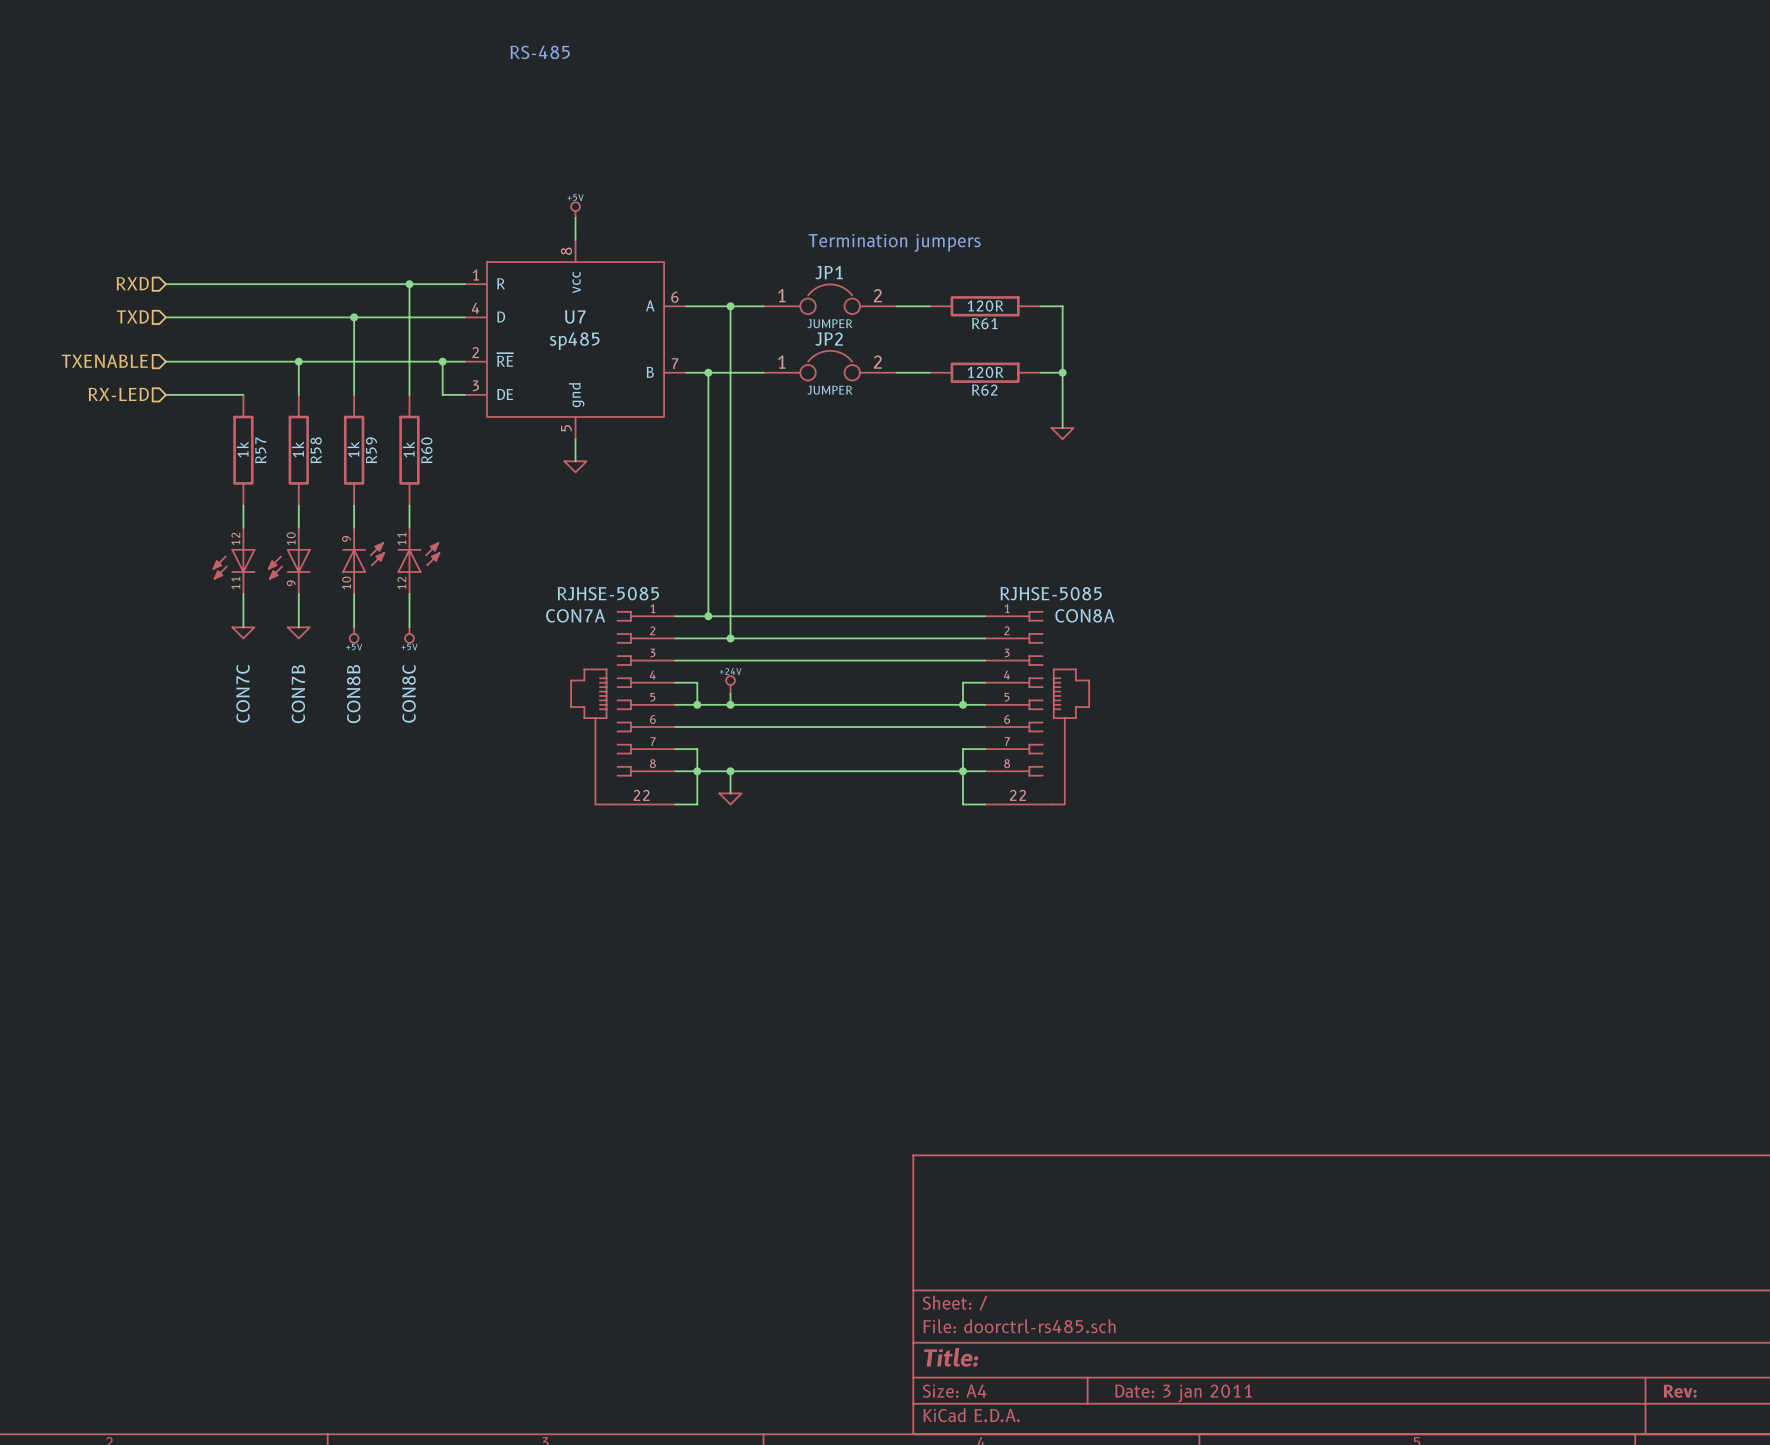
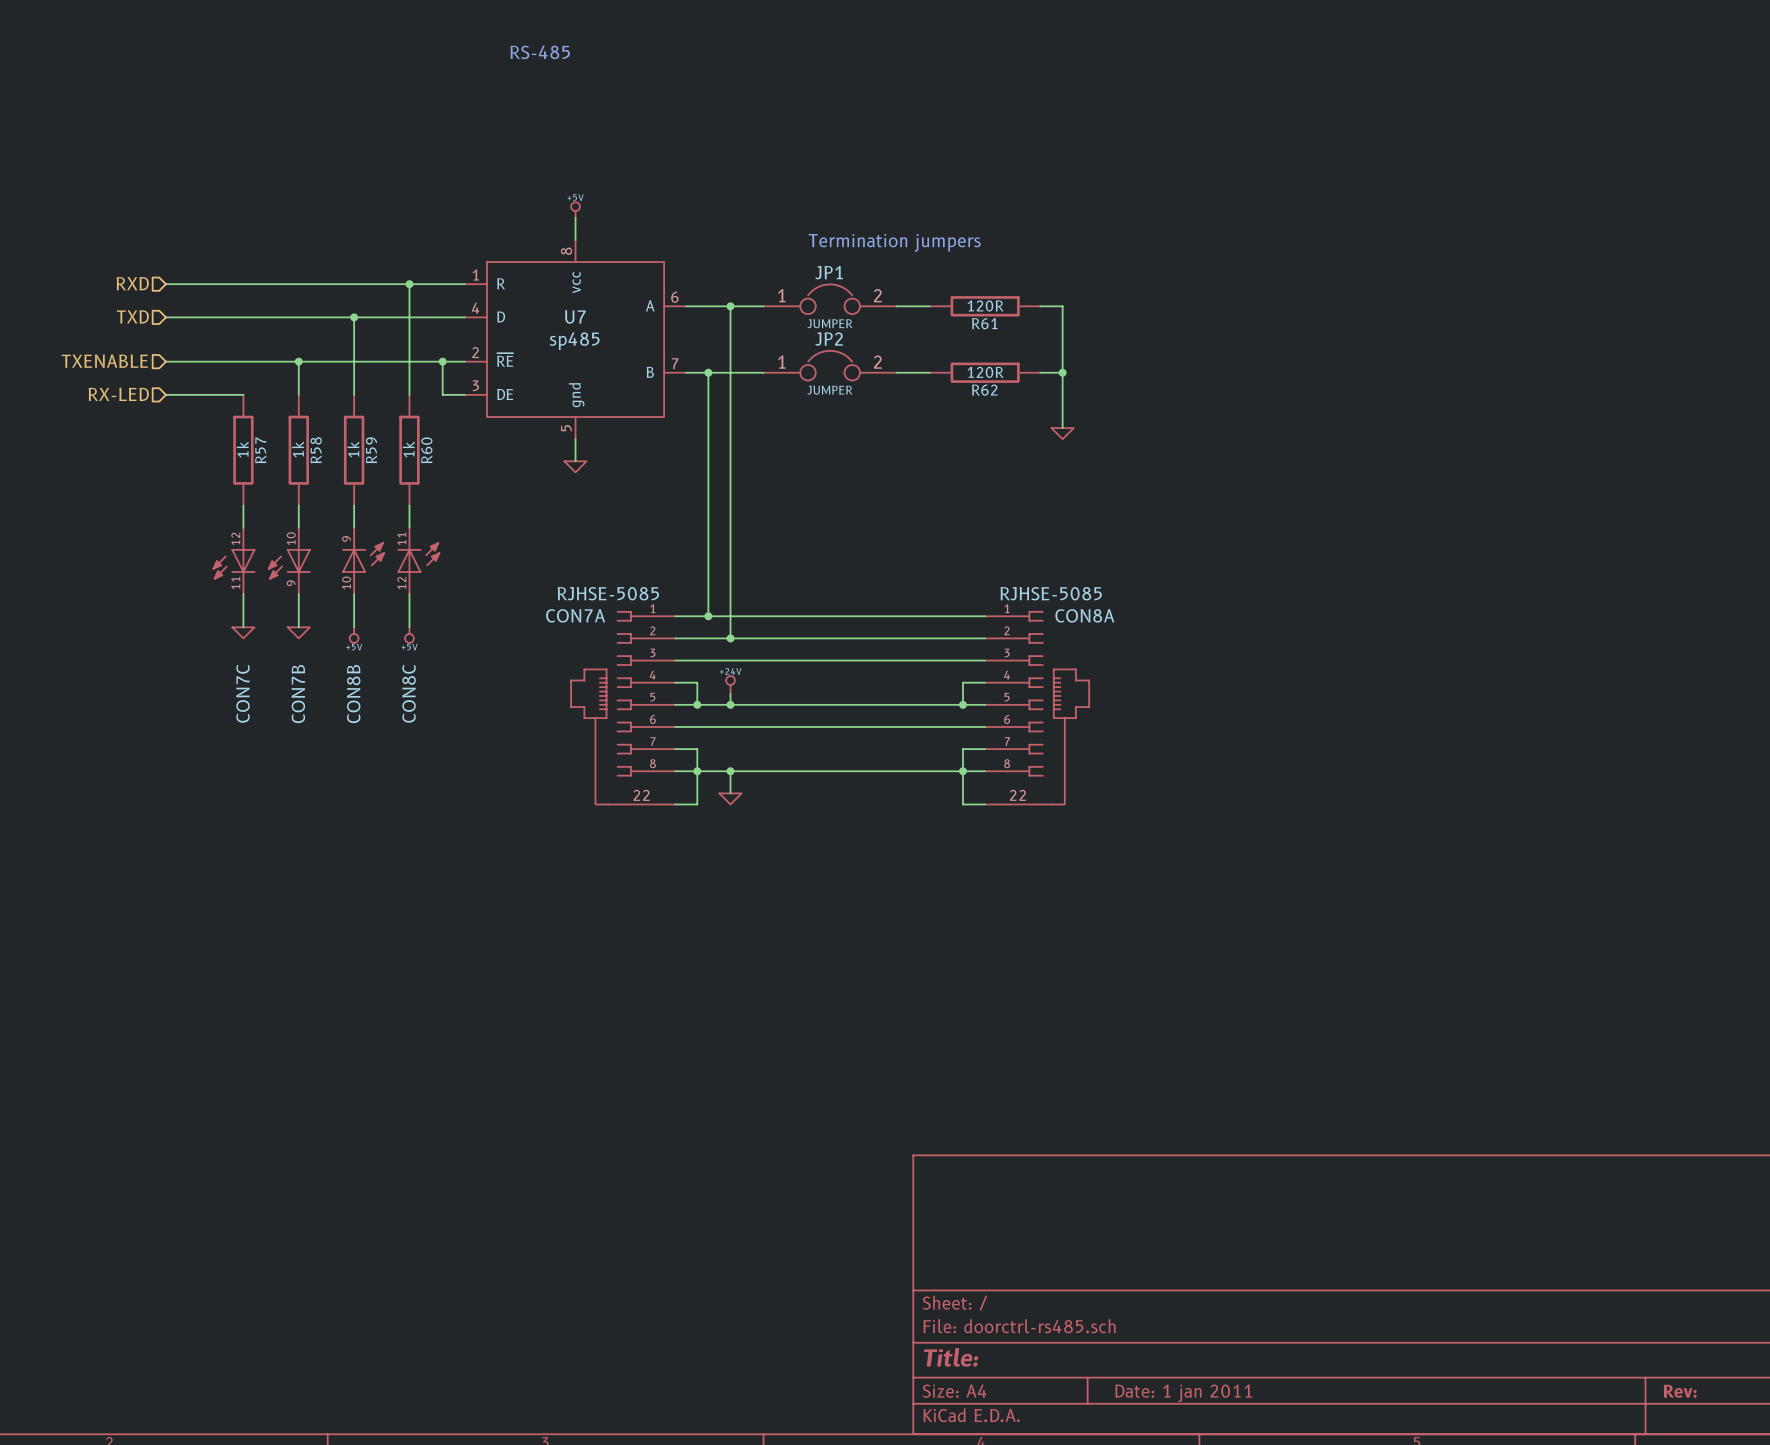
title block: Date: 3 jan 2011 (1183, 1393) -> Date: 1 jan 2011 (1183, 1393)

